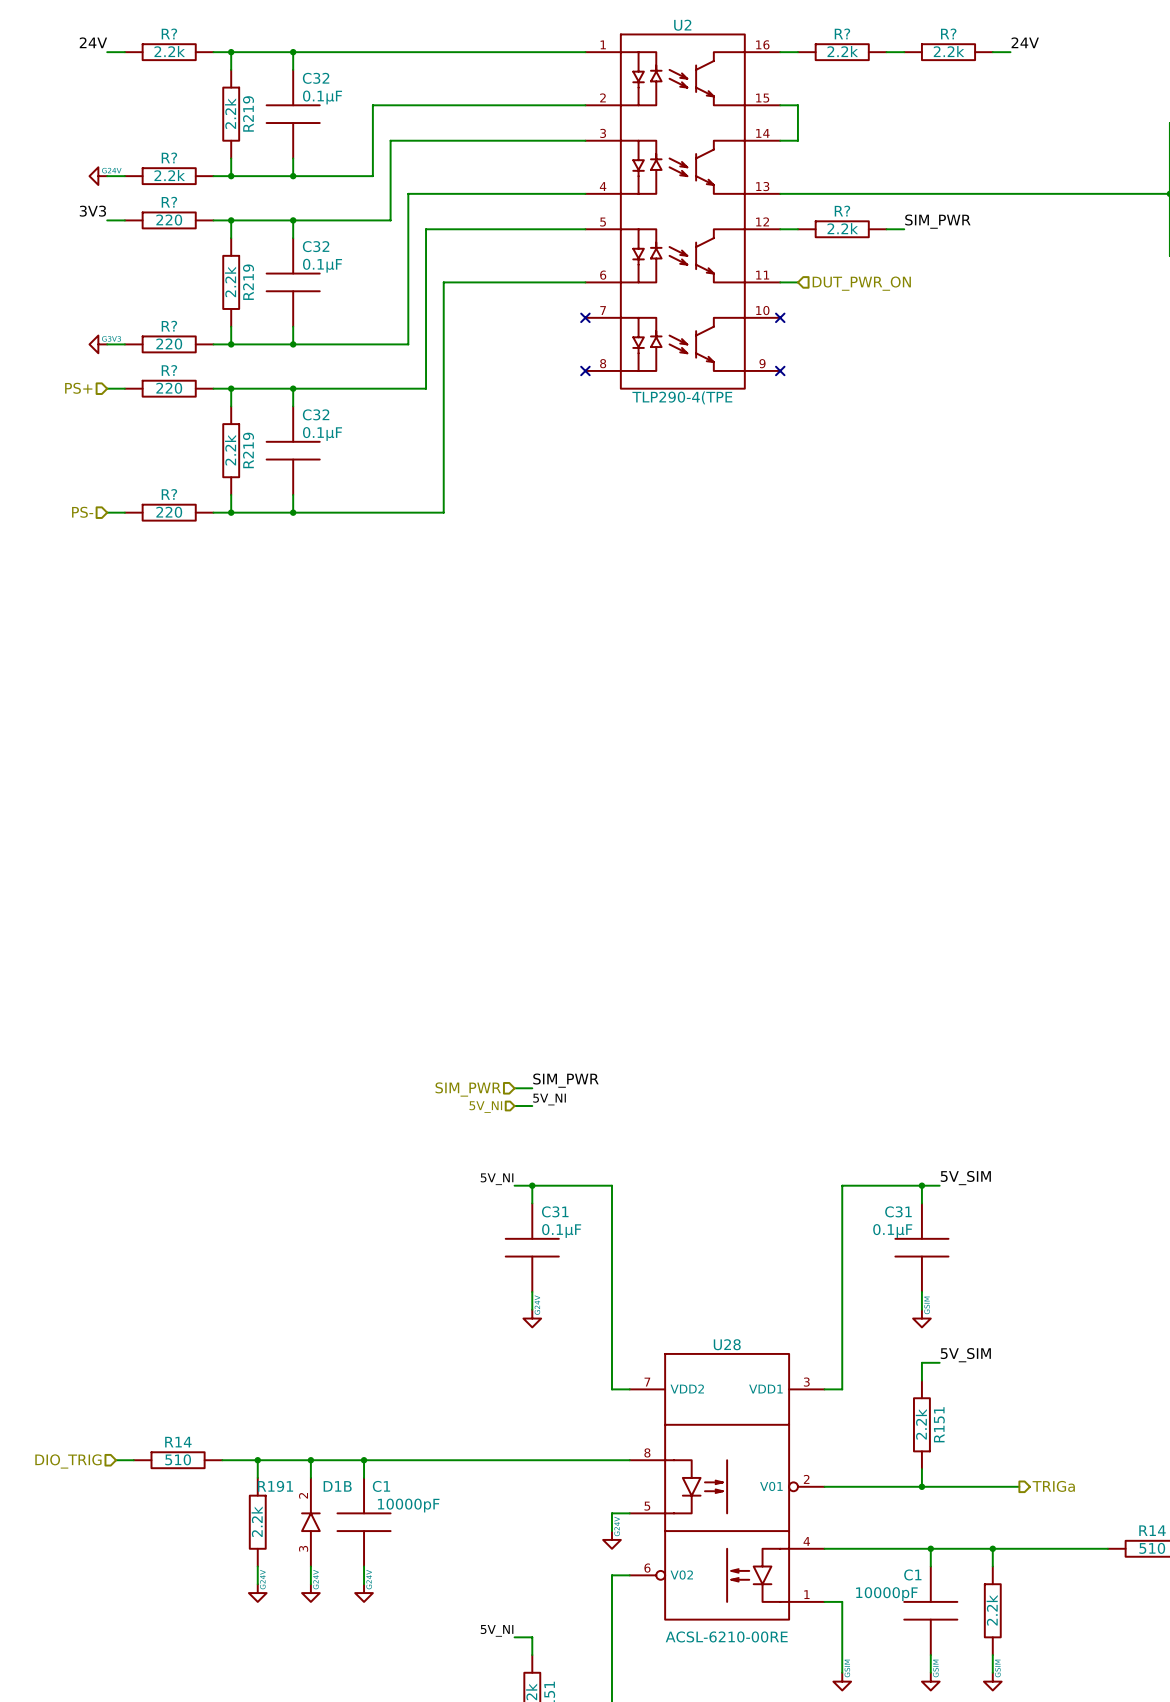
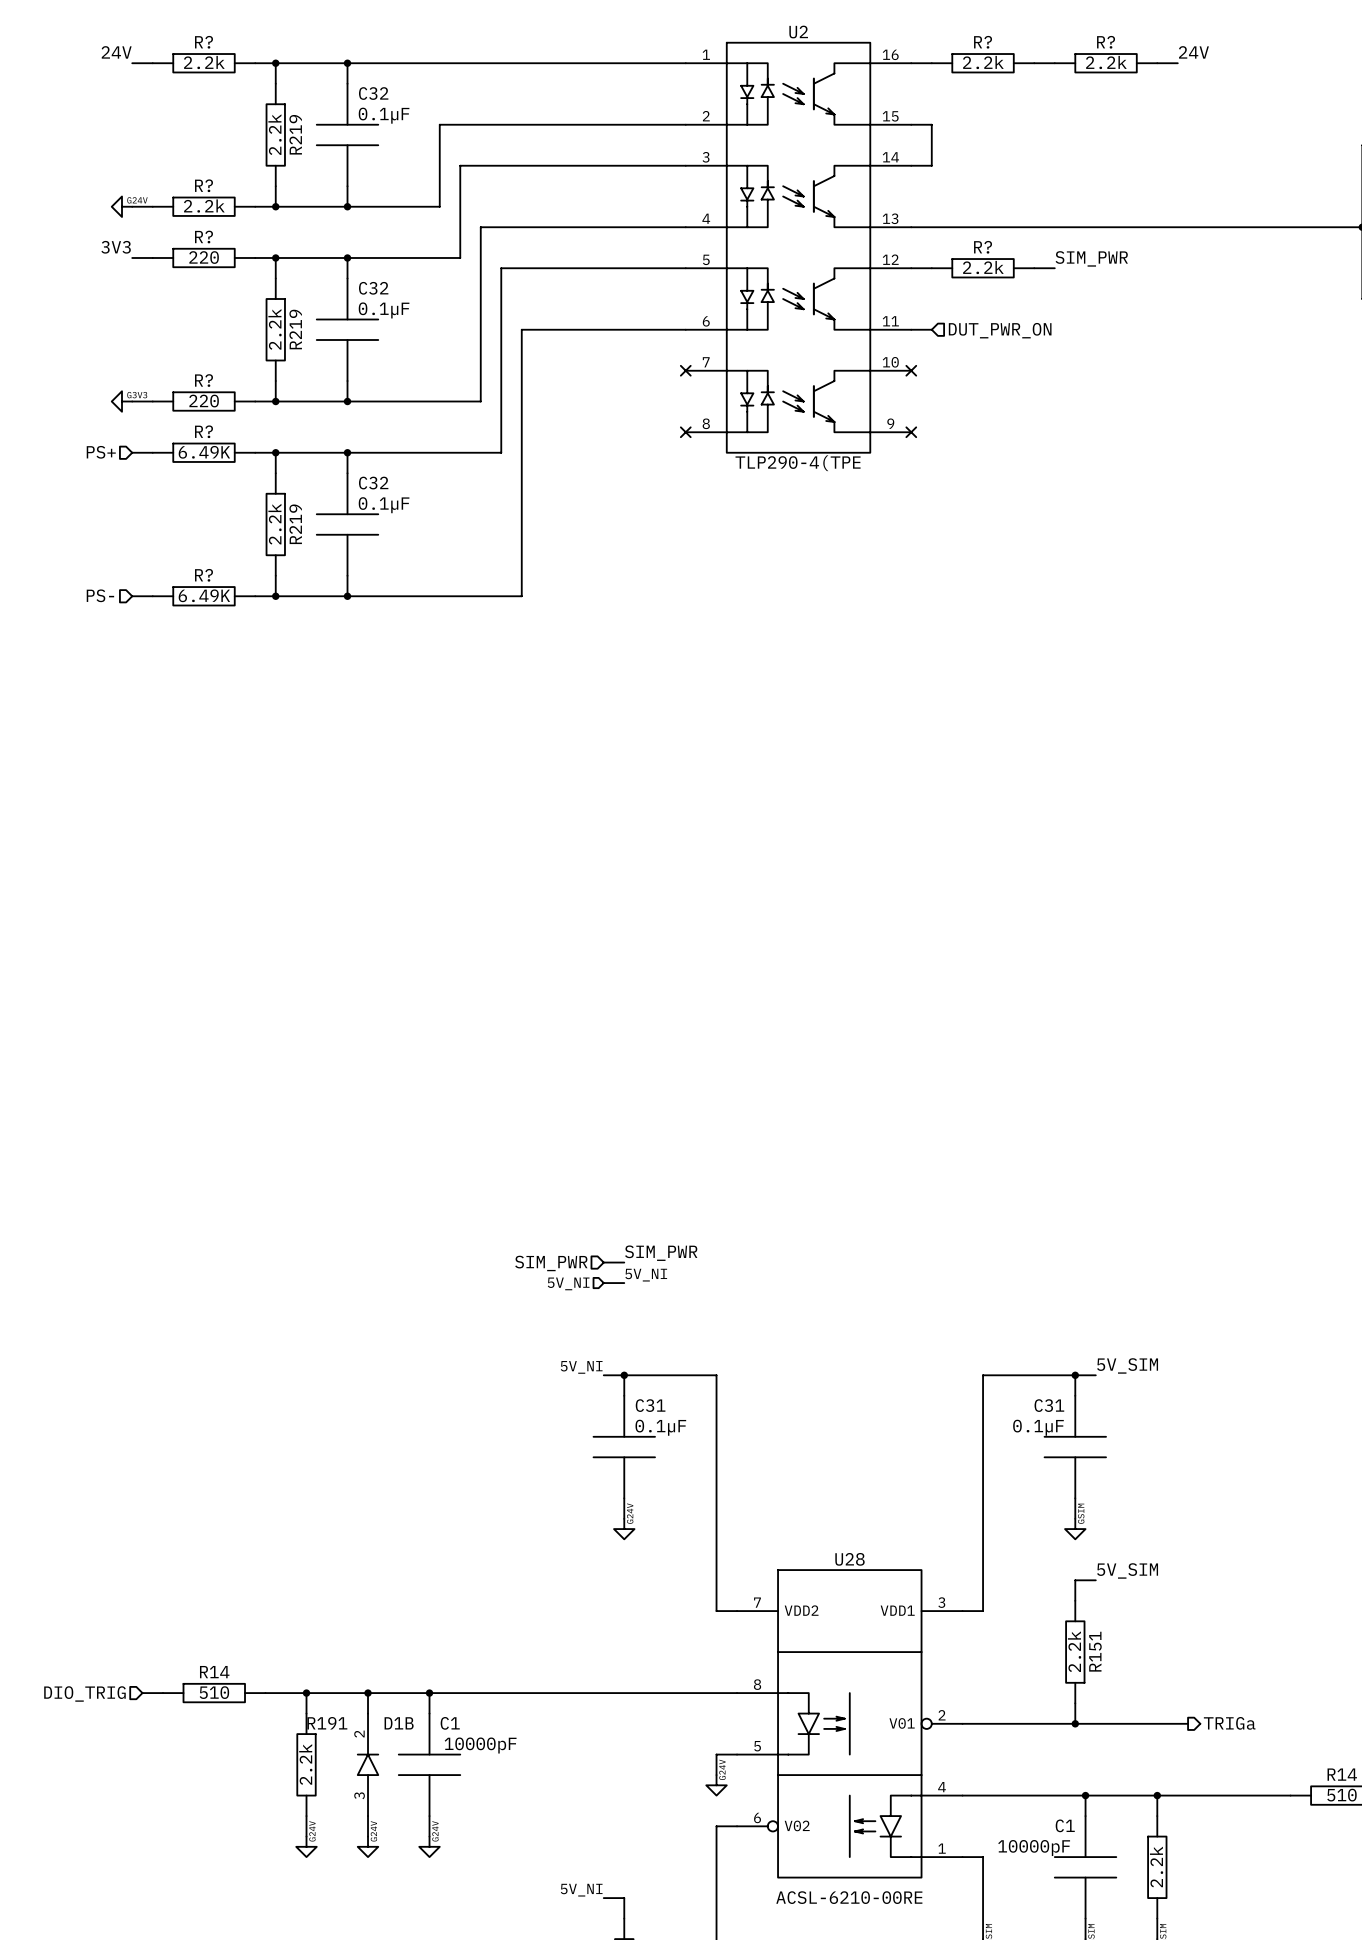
R? text: 220 (169, 388) -> 6.49K (204, 452)
R? text: 220 (169, 512) -> 6.49K (204, 595)

